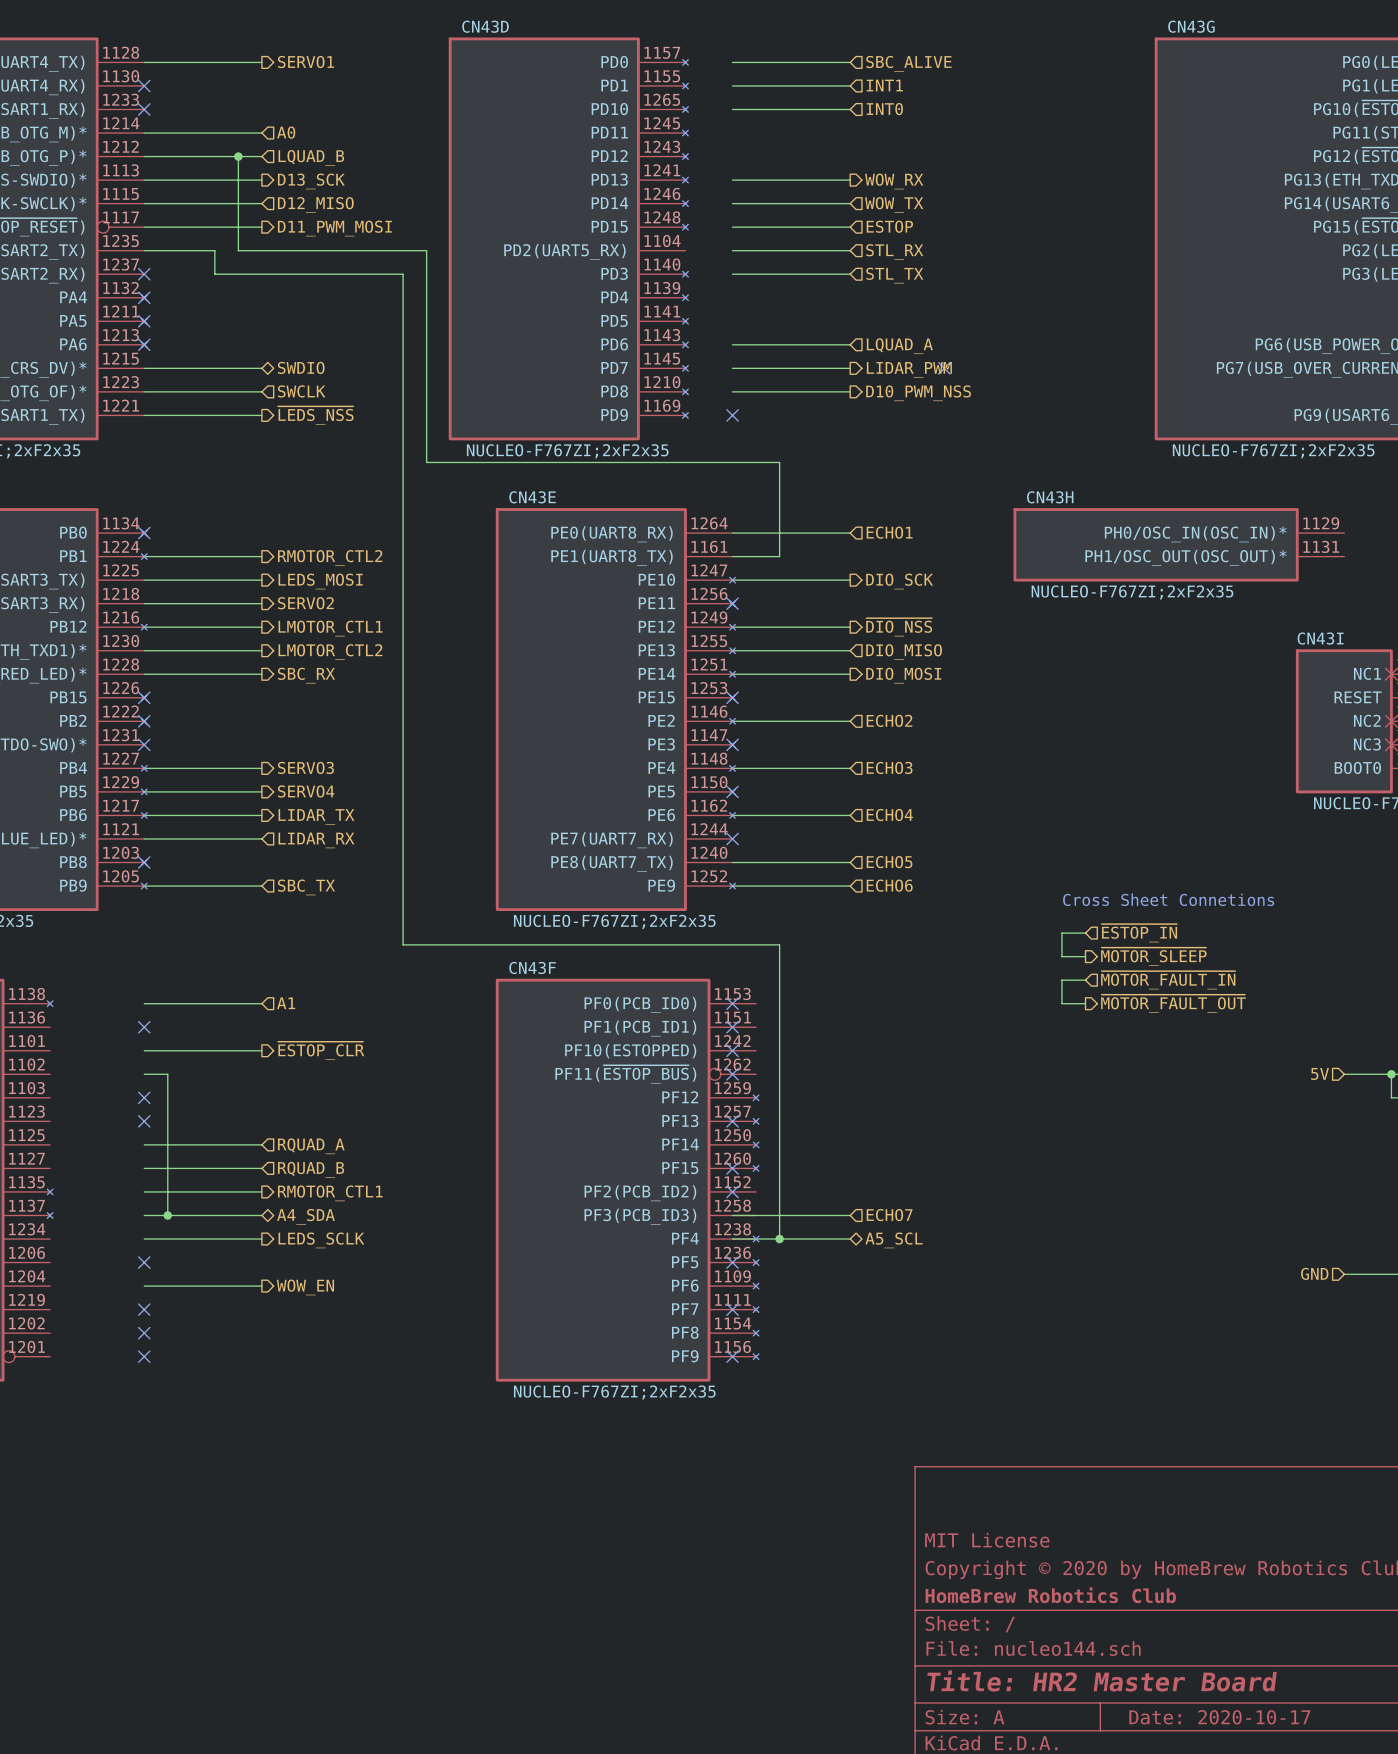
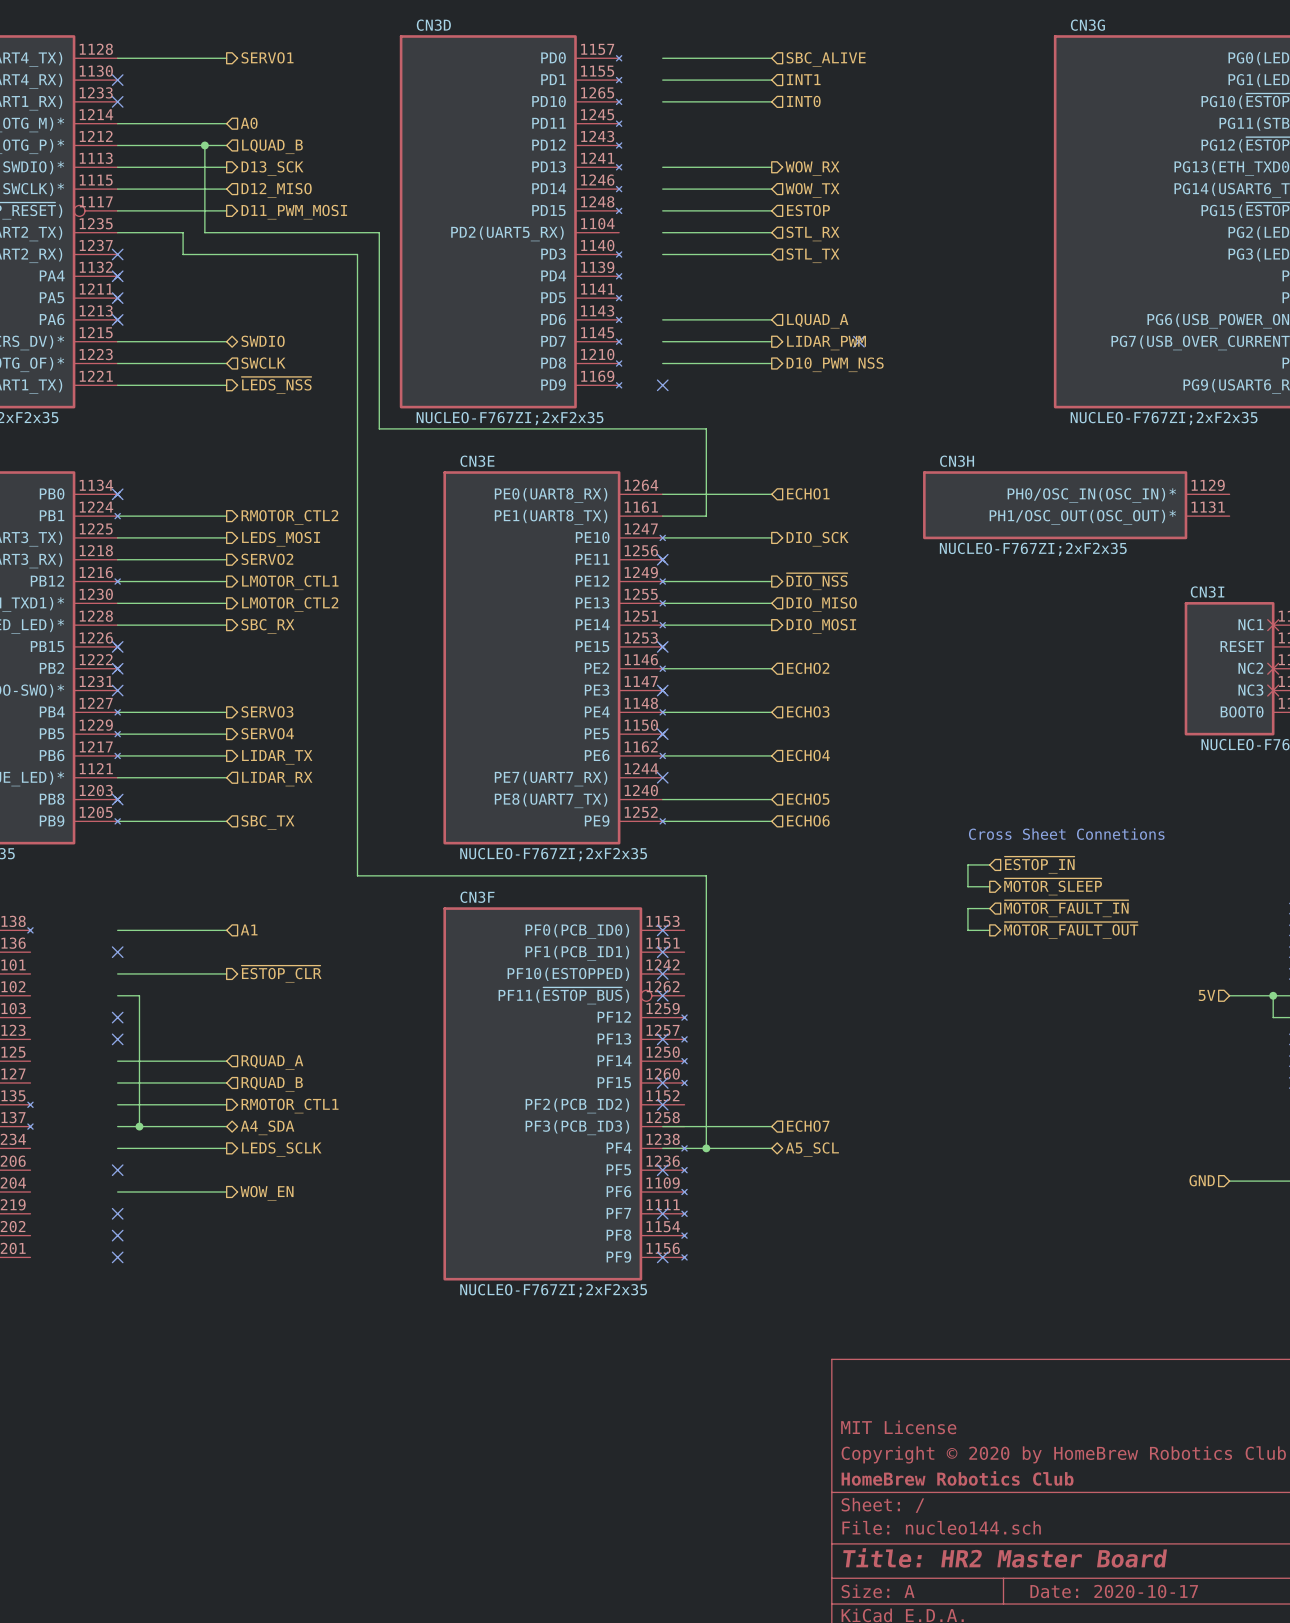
CN43D name: CN43D (485, 26) -> CN3D (433, 25)
CN43G name: CN43G (1191, 26) -> CN3G (1087, 25)
CN43E name: CN43E (532, 497) -> CN3E (477, 461)
CN43H name: CN43H (1050, 497) -> CN3H (957, 461)
CN43I name: CN43I (1320, 638) -> CN3I (1207, 592)
CN43F name: CN43F (532, 967) -> CN3F (477, 897)

